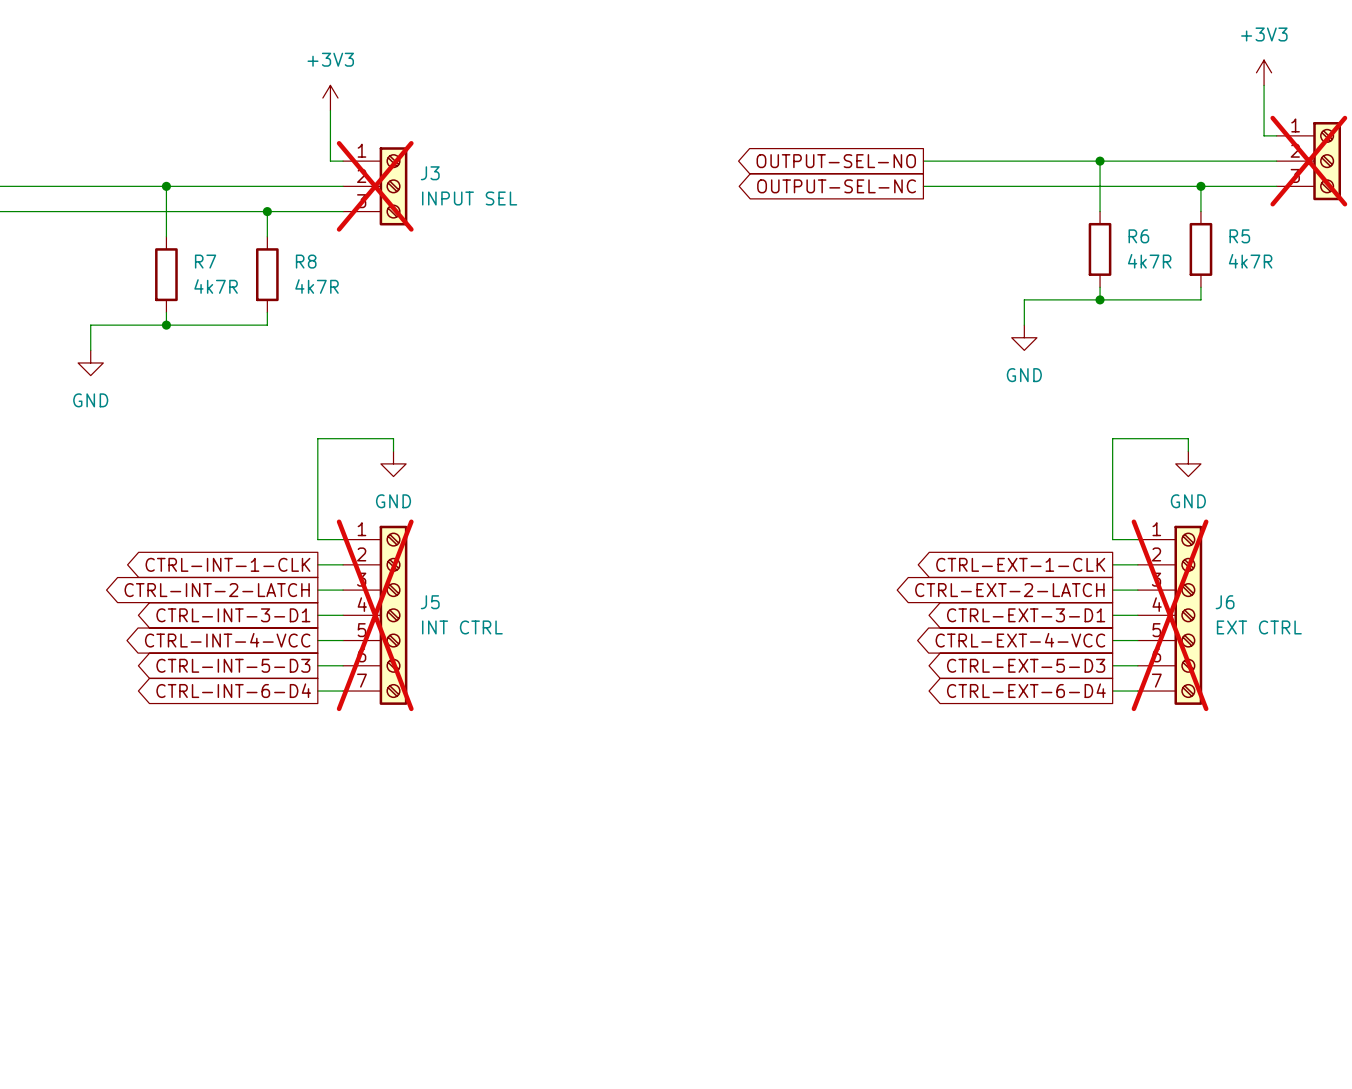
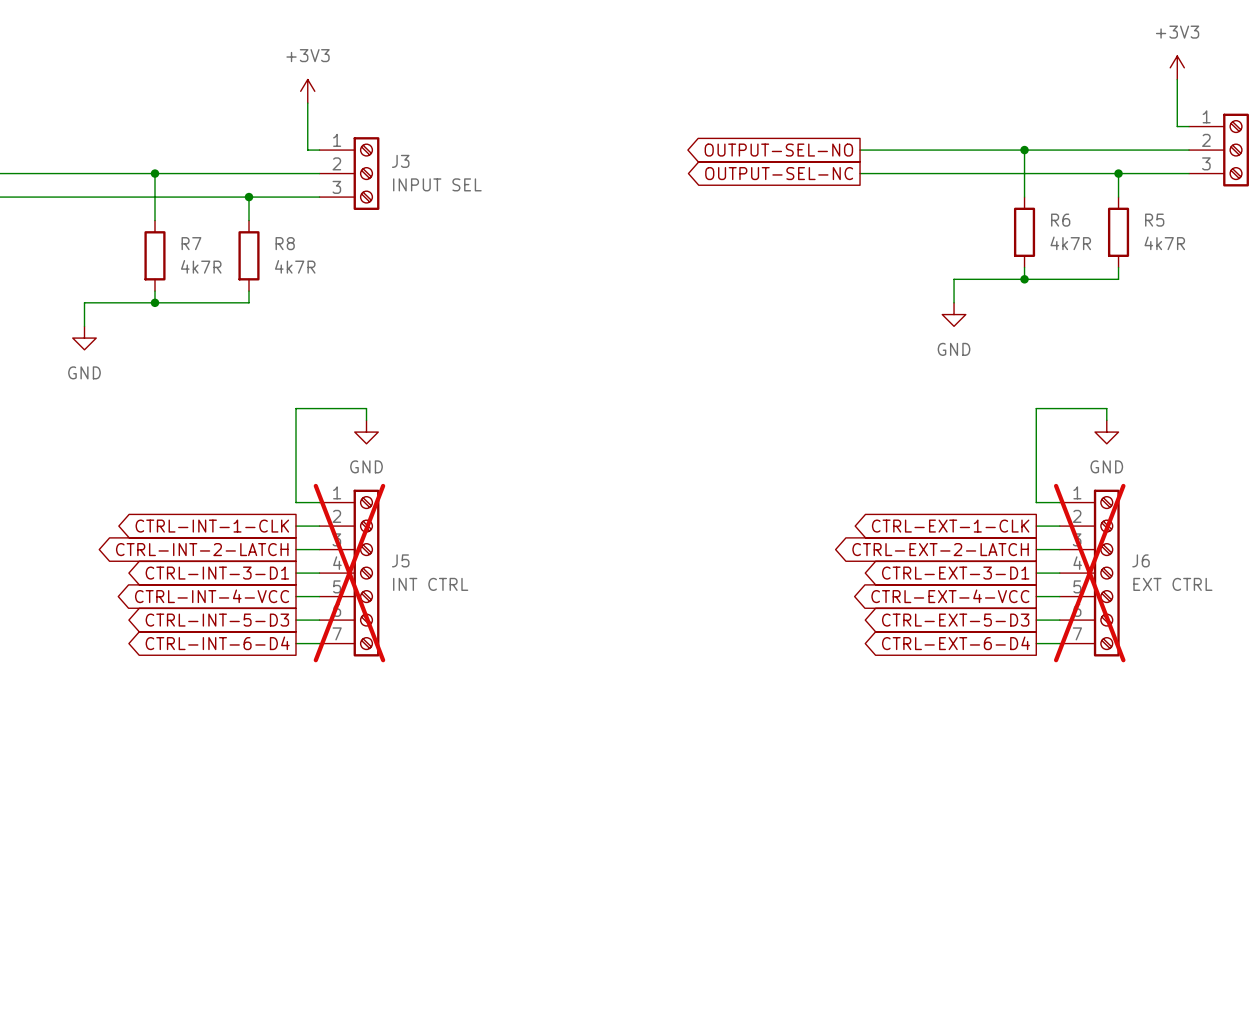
part do-not-place cross: (1308, 161) -> none
J3 do-not-place cross: (375, 186) -> none

